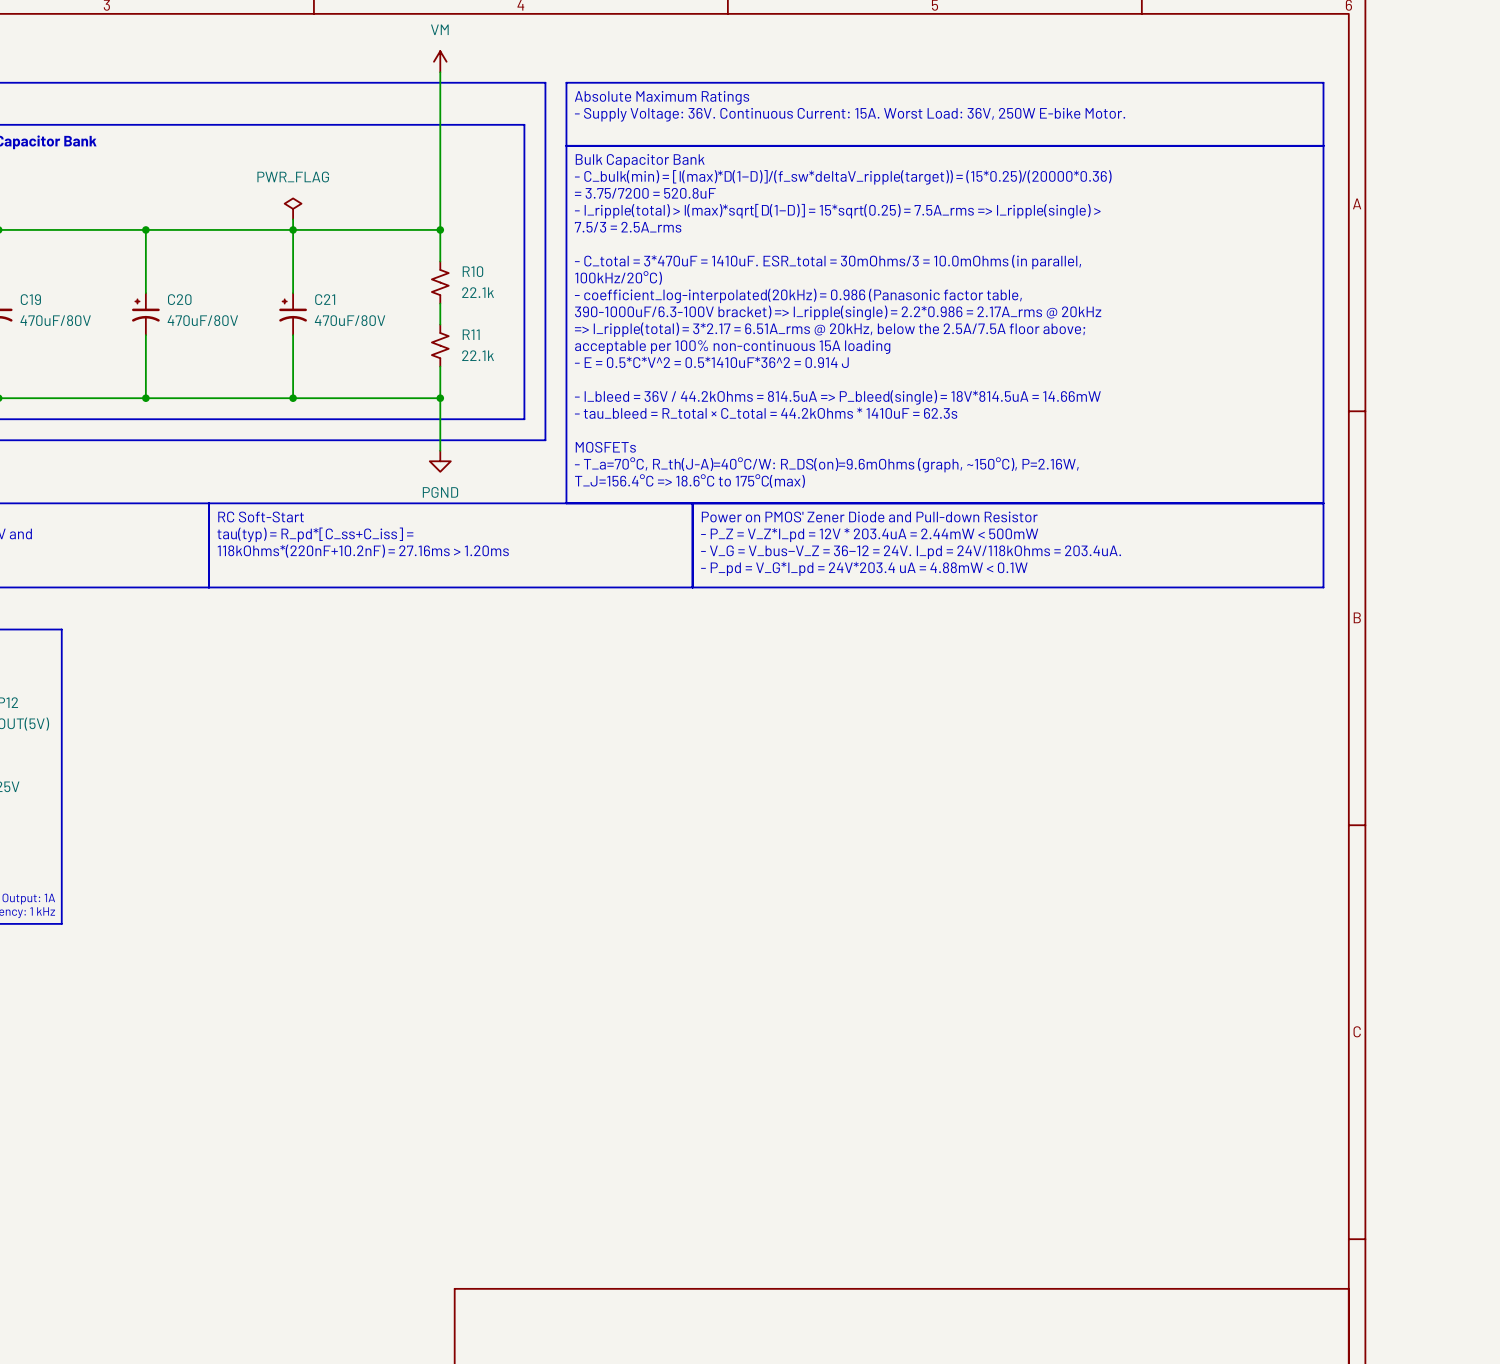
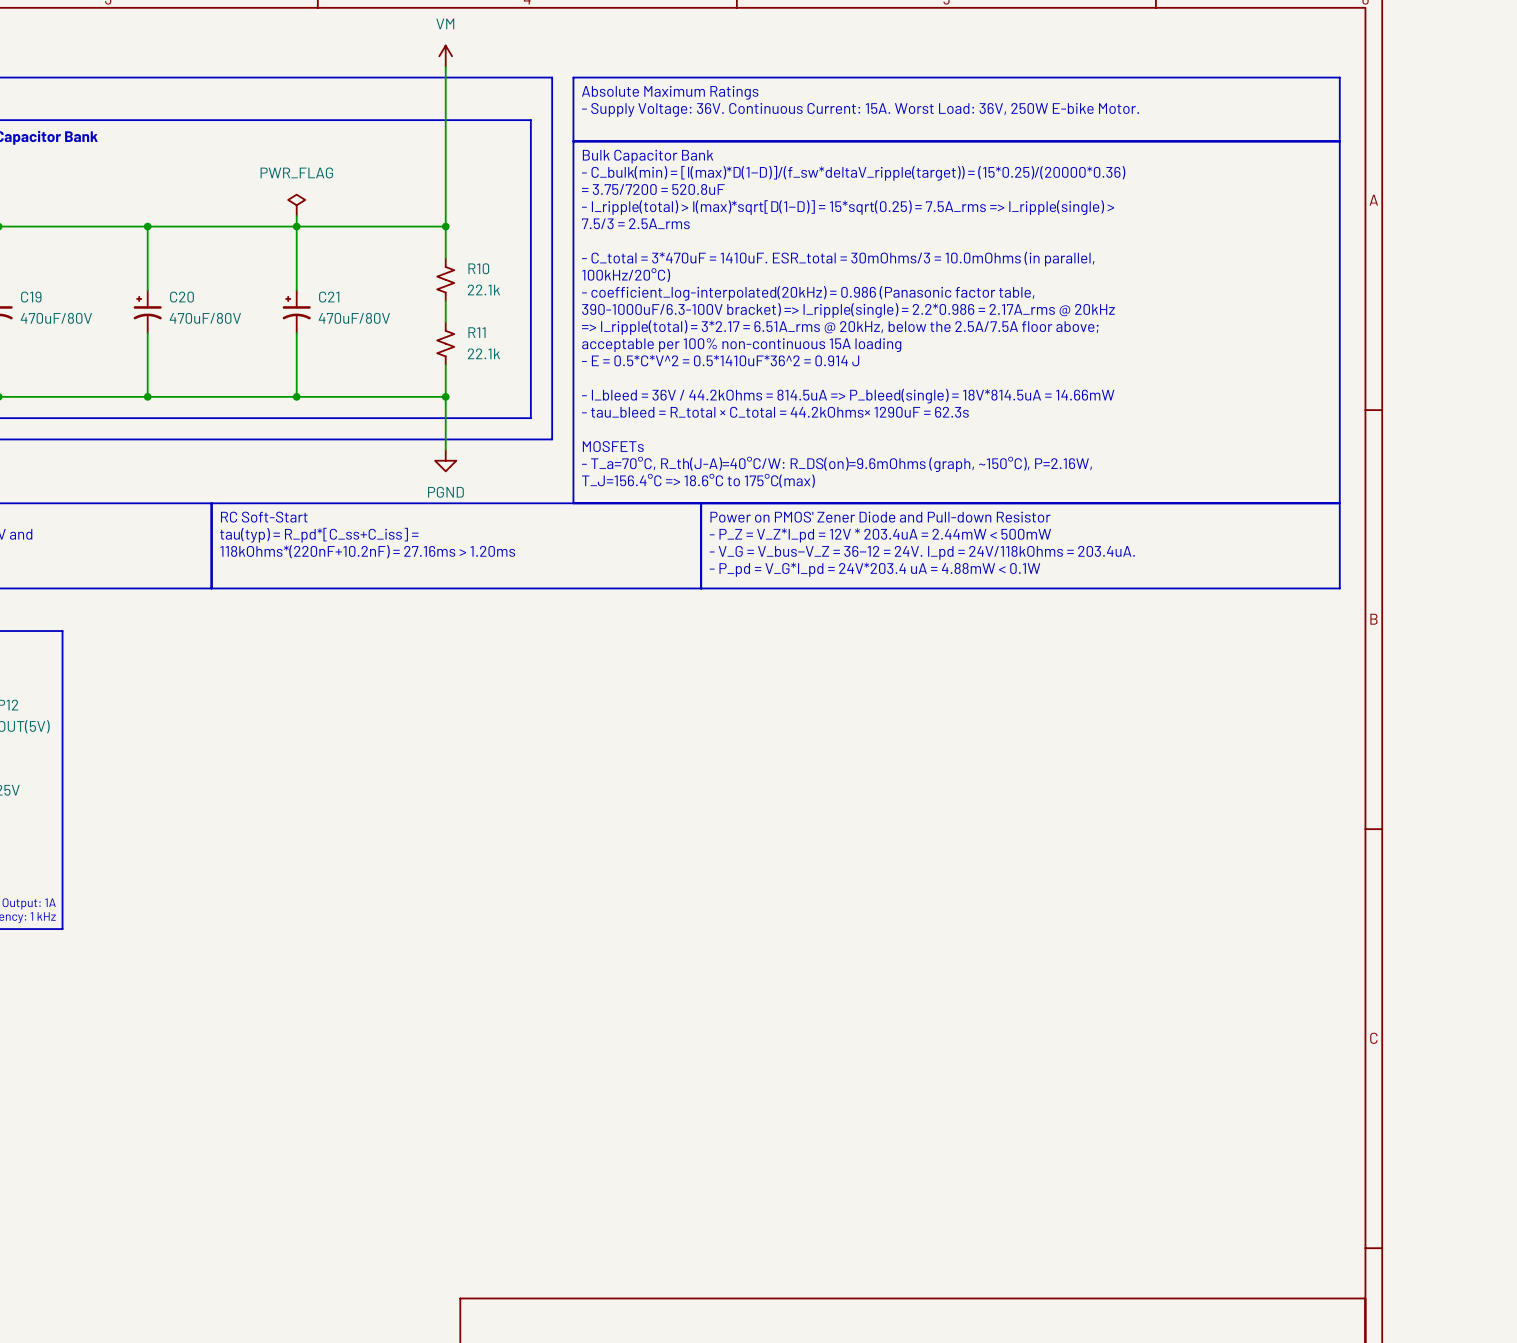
text: - tau_bleed = R_total × C_total = 44.2kOhms * 1410uF = 62.3s (766, 413) -> - tau_bleed = R_total × C_total = 44.2kOhms× 1290uF = 62.3s (775, 412)

